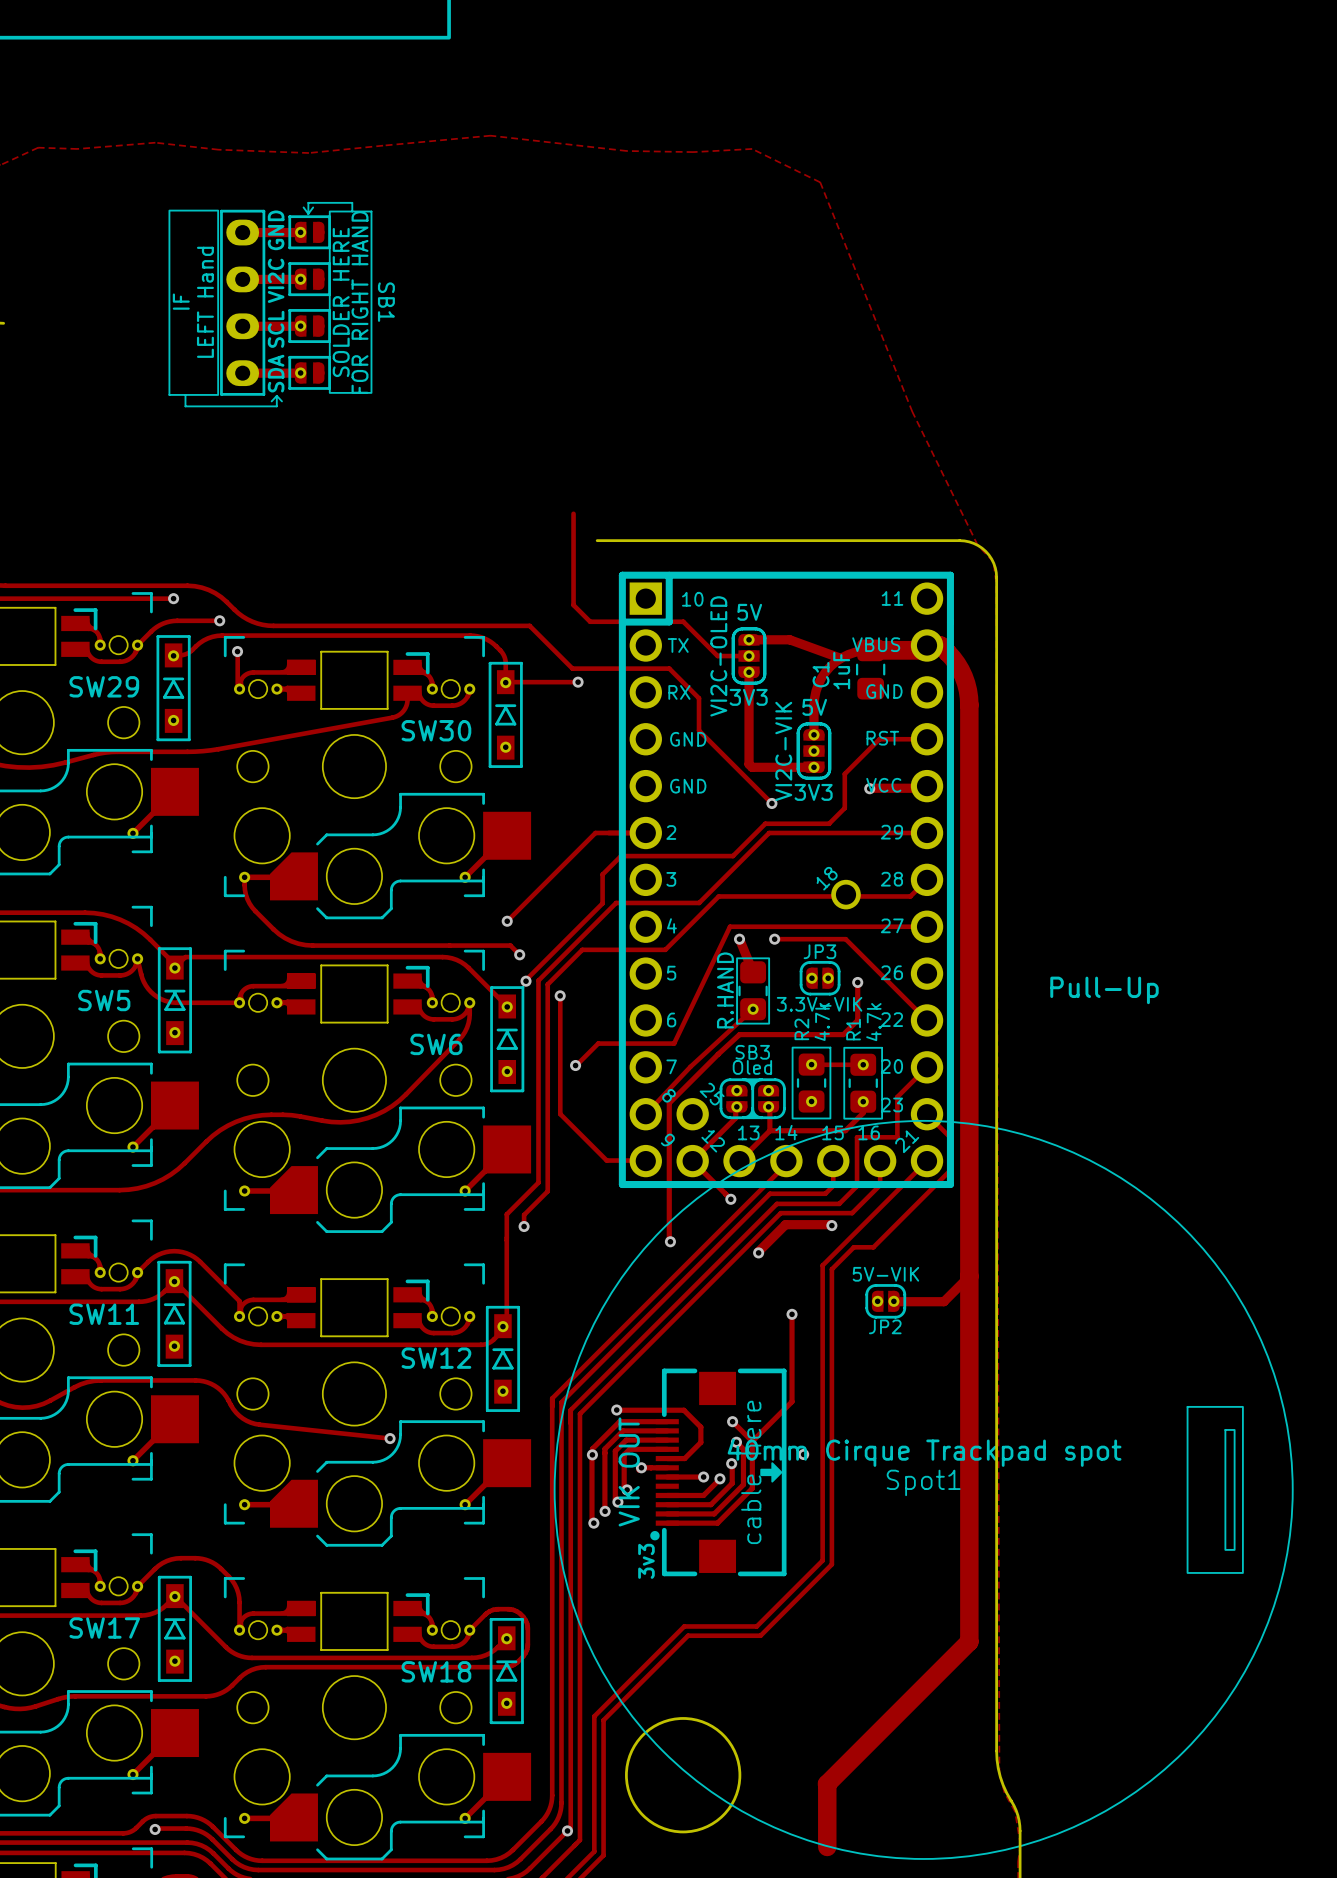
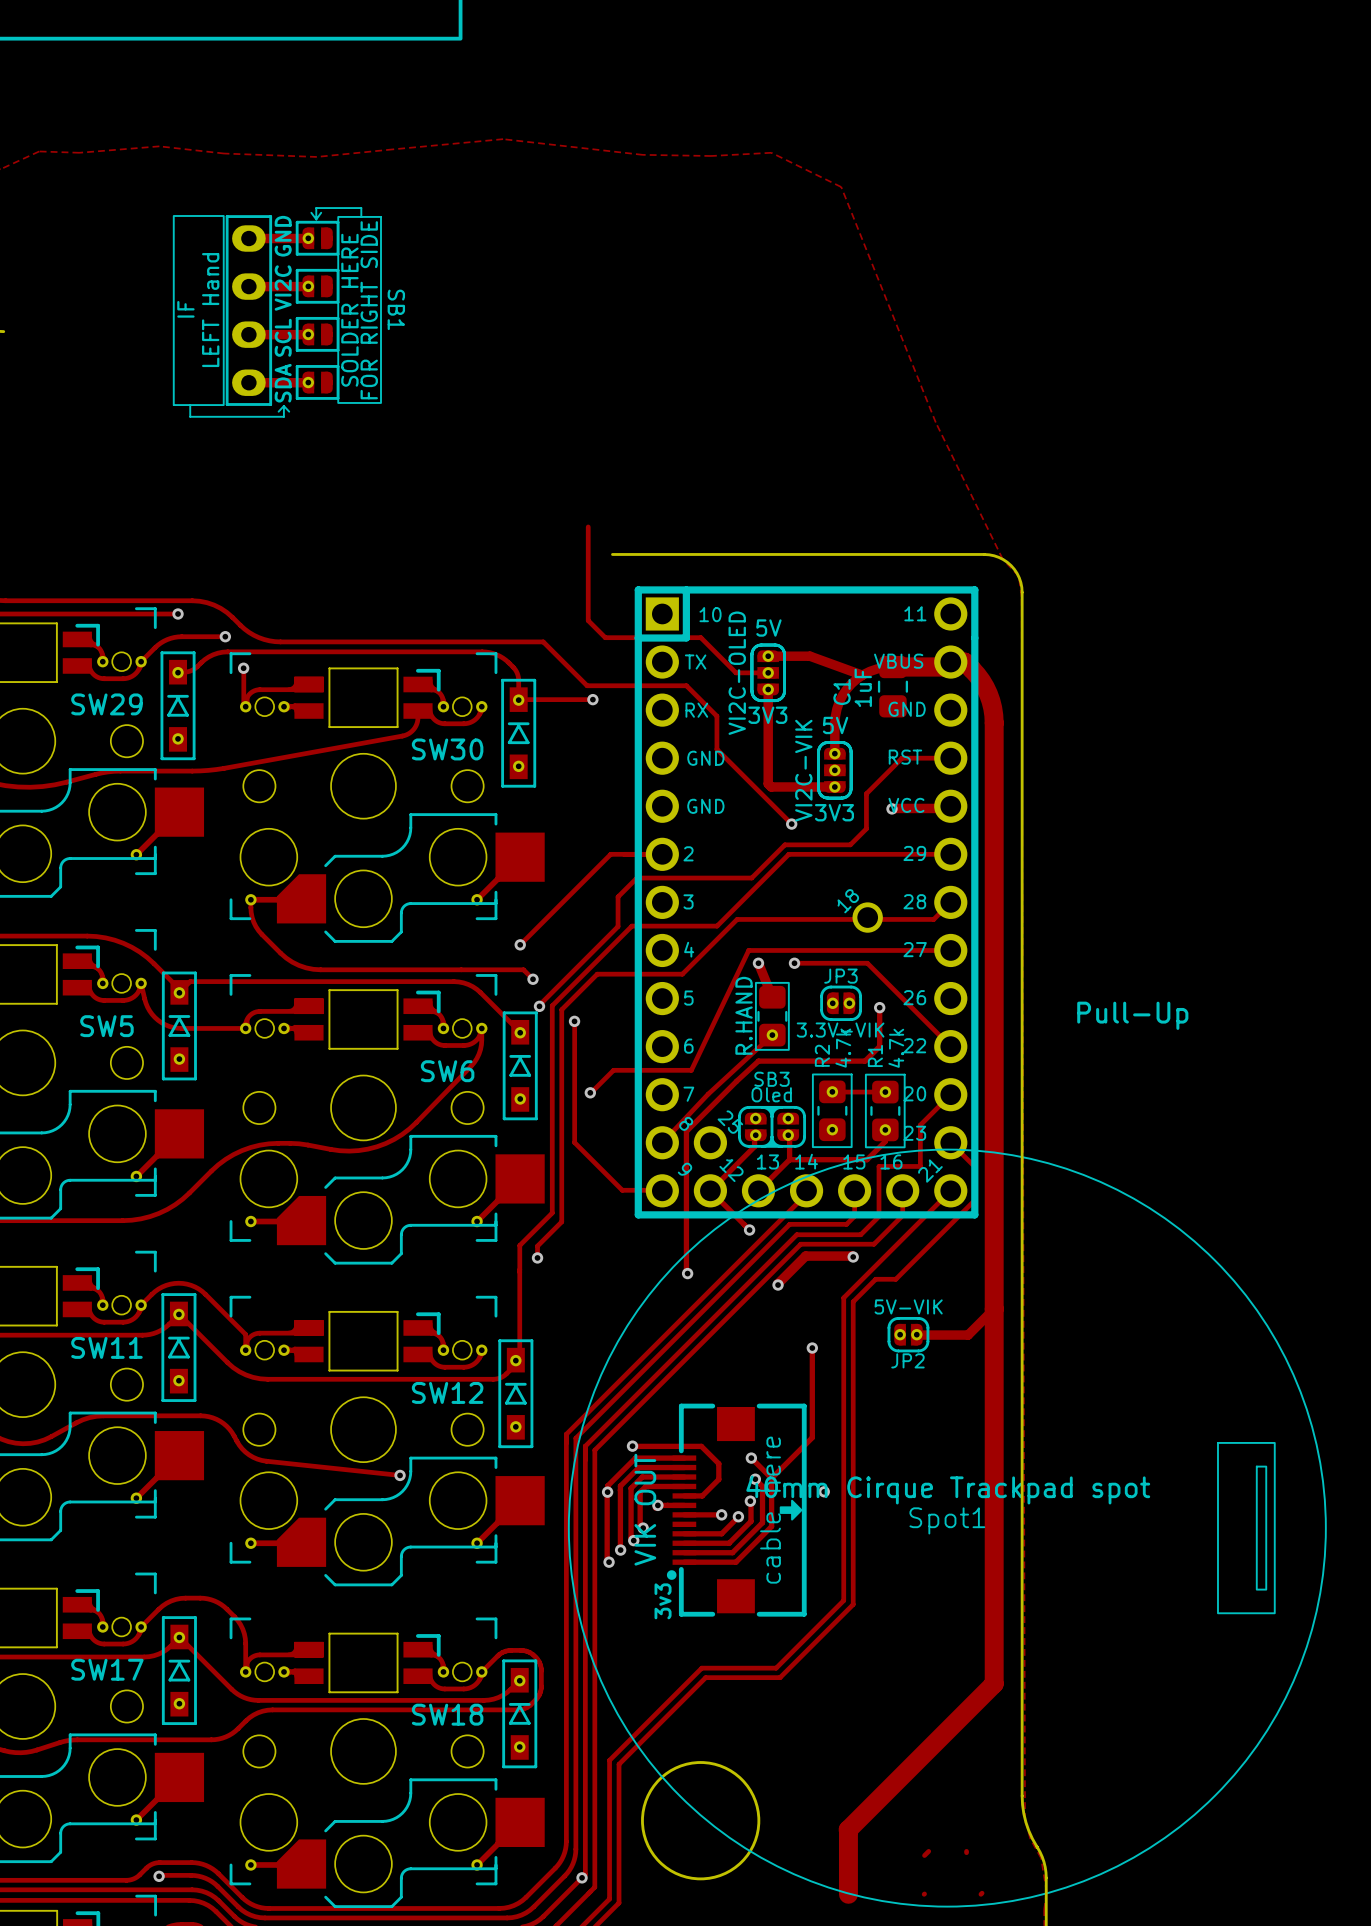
SB1 text: FOR RIGHT HAND (360, 302) -> FOR RIGHT SIDE (369, 310)
track: none -> (928, 1851) (924, 1855)
track: none -> (966, 1851) (966, 1852)
track: none -> (982, 1893) (980, 1894)
track: none -> (924, 1893) (924, 1894)

